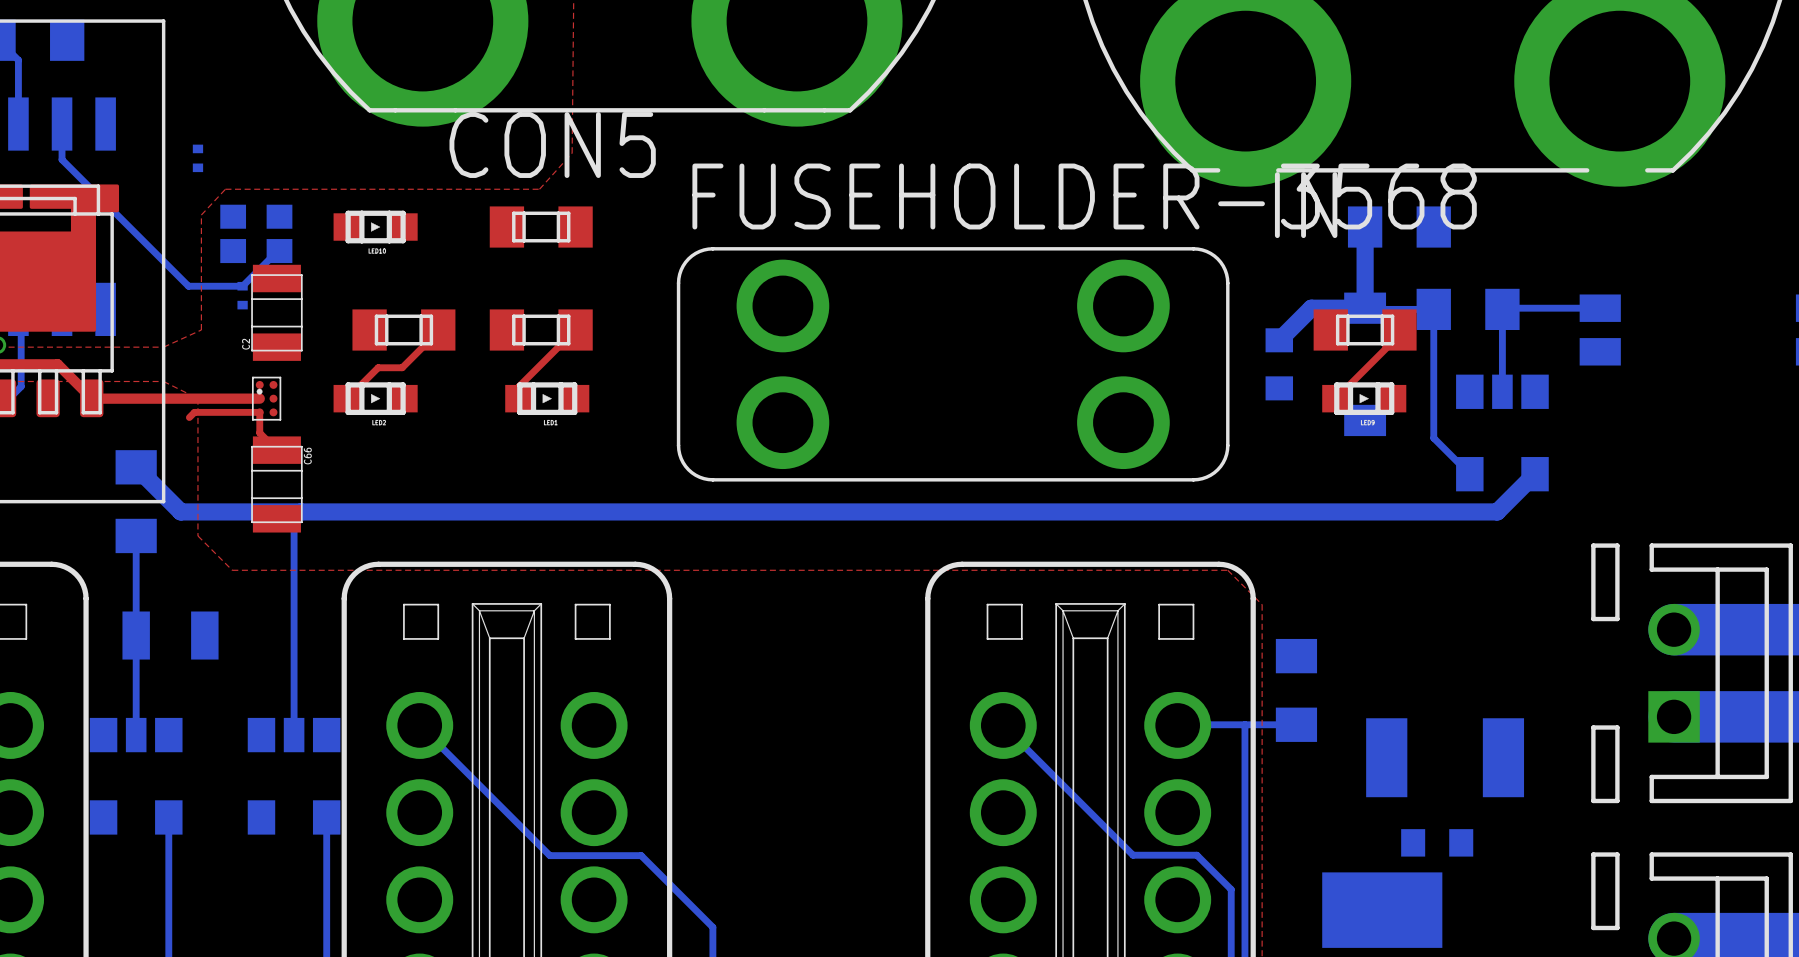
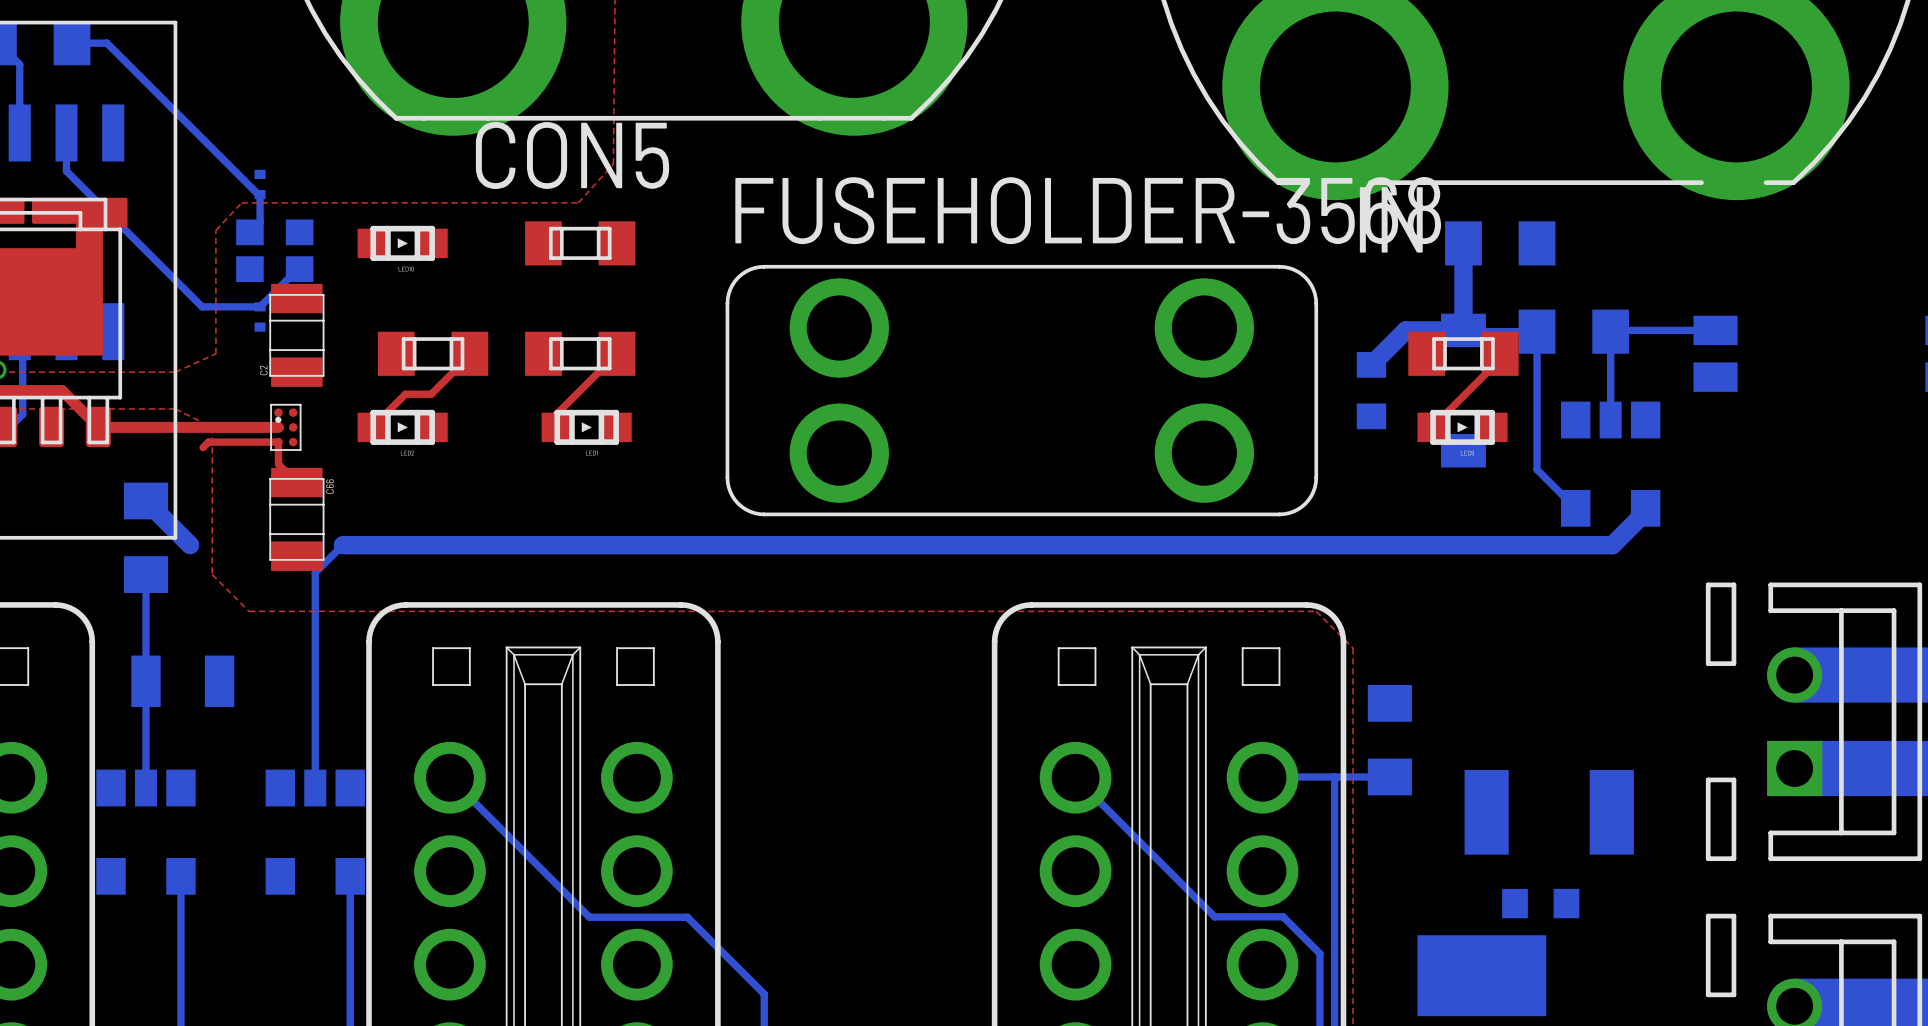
bottom track: none -> (72, 43) (106, 43) (260, 194) (260, 222) (249, 232)
part position: (197, 158) -> (260, 184)
bottom track: (1535, 474) (1497, 511) (180, 511) (177, 508) -> (1645, 508) (1645, 512) (1612, 545) (342, 545) (315, 572)

